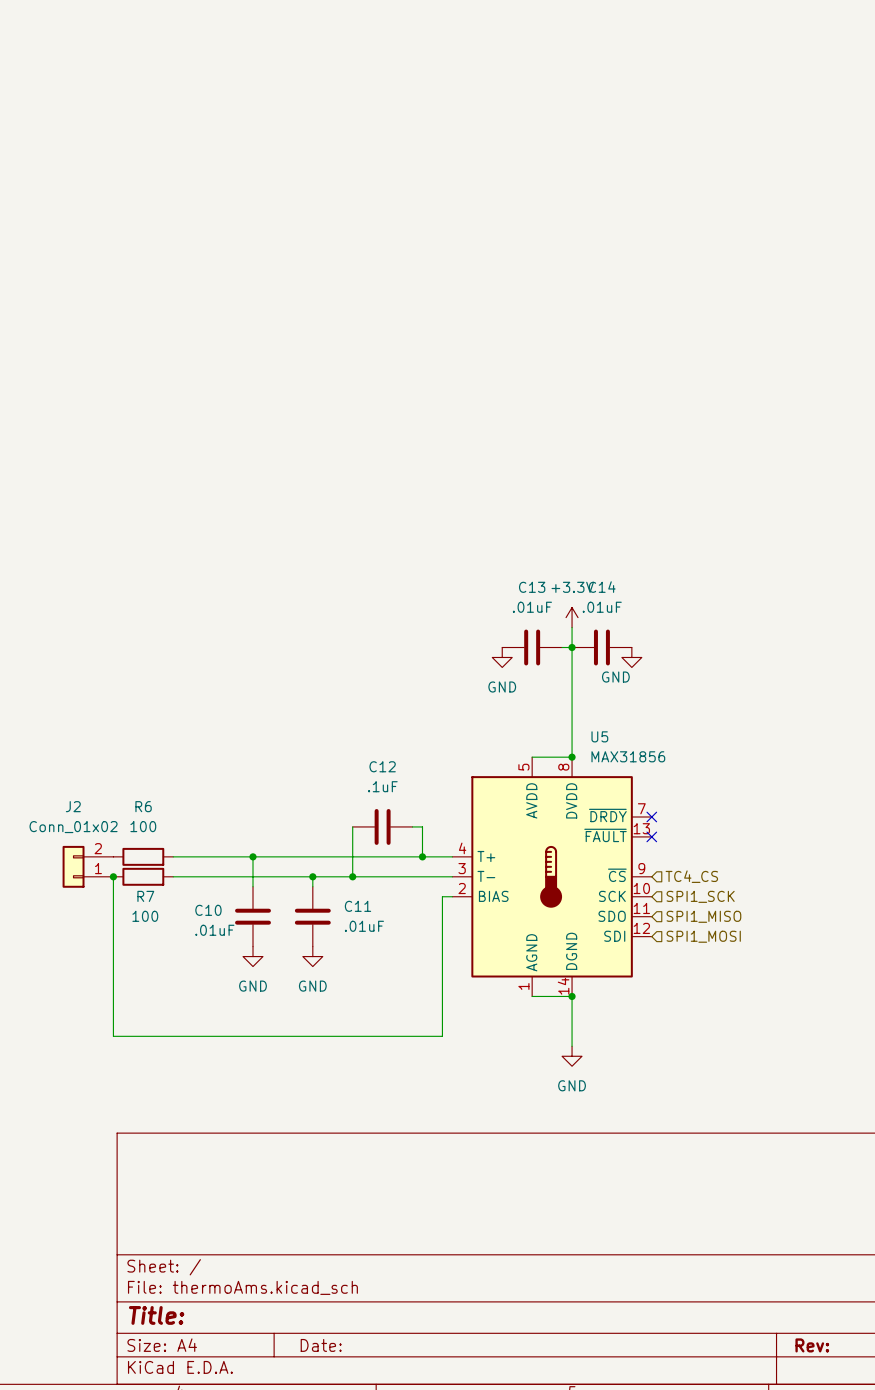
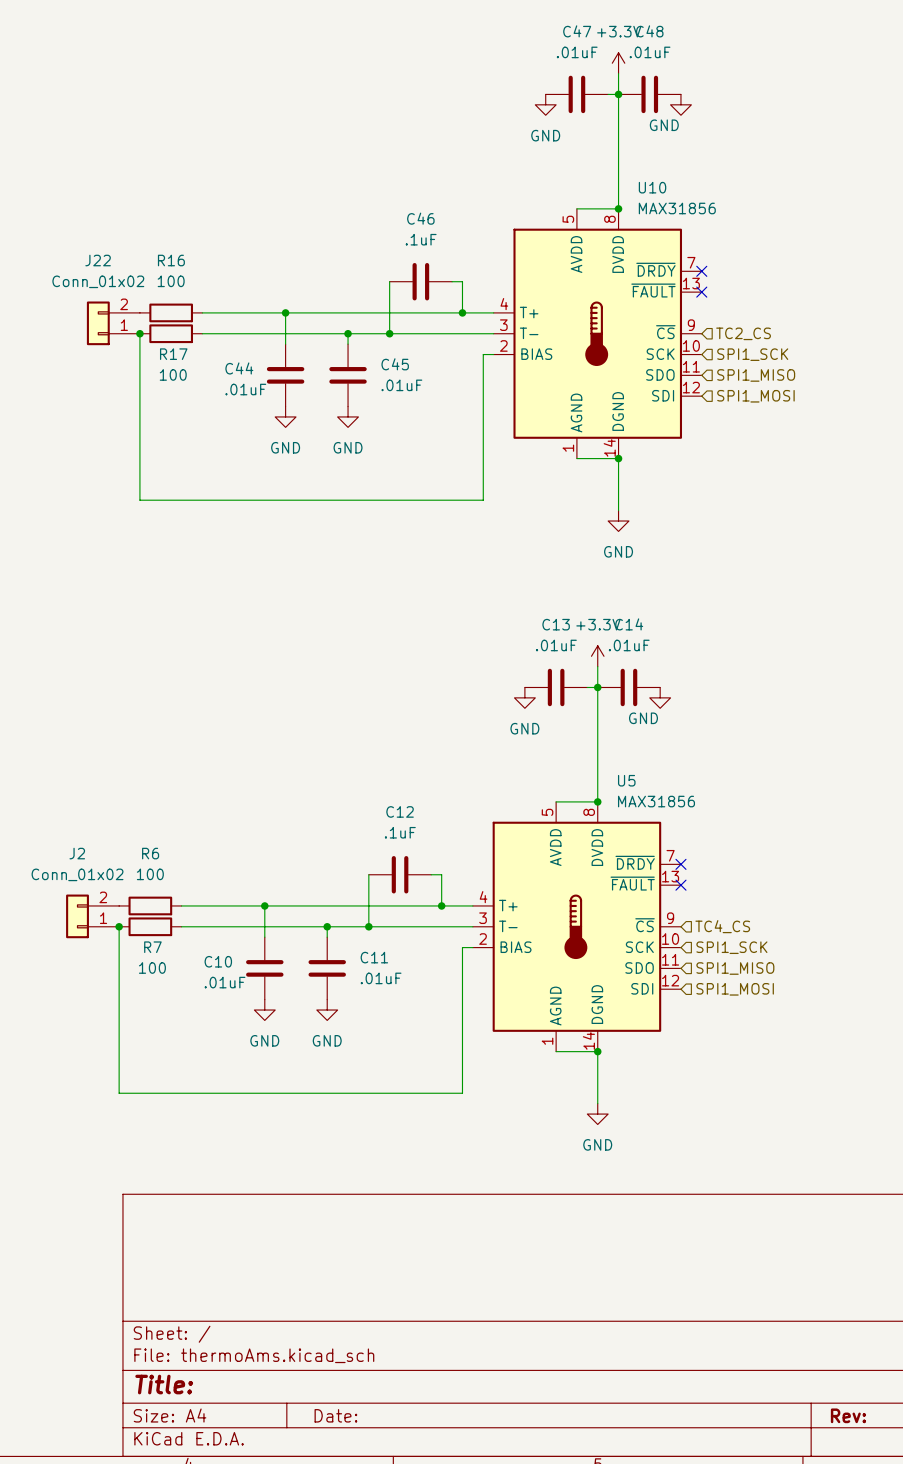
power symbol: none -> +3.3V (618, 63)
wire: none -> (618, 73) (618, 208) (576, 208)
C47: none -> .01uF (576, 94)
wire: none -> (608, 94) (618, 94)
junction: none -> (618, 94)
C48: none -> .01uF (649, 94)
power symbol: none -> GND (545, 104)
power symbol: none -> GND (680, 104)
junction: none -> (618, 208)
no-connect mark: none -> (701, 271)
wire: none -> (389, 281) (389, 333)
C46: none -> .1uF (420, 281)
wire: none -> (452, 281) (462, 281) (462, 312)
no-connect mark: none -> (701, 292)
R16: none -> 100 (171, 312)
wire: none -> (202, 312) (493, 312)
wire: none -> (285, 312) (285, 344)
junction: none -> (285, 312)
junction: none -> (462, 312)
J22: none -> Conn_01x02 (113, 323)
wire: none -> (139, 333) (139, 500) (483, 500) (483, 354) (493, 354)
junction: none -> (139, 333)
R17: none -> 100 (171, 333)
wire: none -> (202, 333) (493, 333)
wire: none -> (348, 333) (348, 344)
junction: none -> (348, 333)
junction: none -> (389, 333)
U10: none -> MAX31856 (597, 333)
hierarchical label: none -> TC2_CS (743, 333)
hierarchical label: none -> SPI1_SCK (752, 354)
C44: none -> .01uF (285, 375)
C45: none -> .01uF (348, 375)
hierarchical label: none -> SPI1_MISO (756, 375)
hierarchical label: none -> SPI1_MOSI (755, 396)
power symbol: none -> GND (285, 416)
power symbol: none -> GND (348, 416)
wire: none -> (576, 458) (618, 458) (618, 510)
junction: none -> (618, 458)
power symbol: none -> GND (618, 521)

